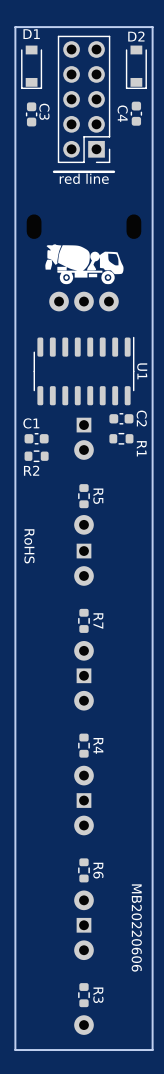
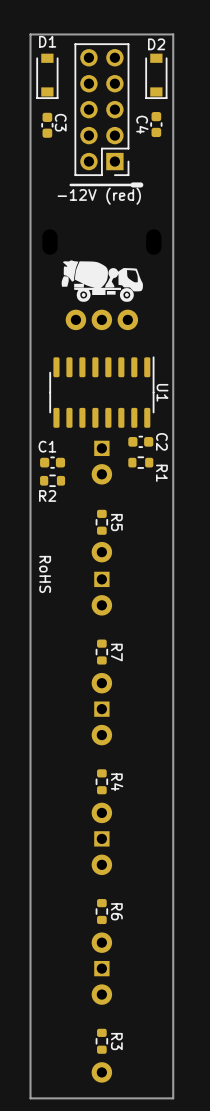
line: none -> (140, 184) (133, 184)
text: red line (84, 178) -> -12V (red) (99, 196)
text: MB20220606 (136, 928) -> none

